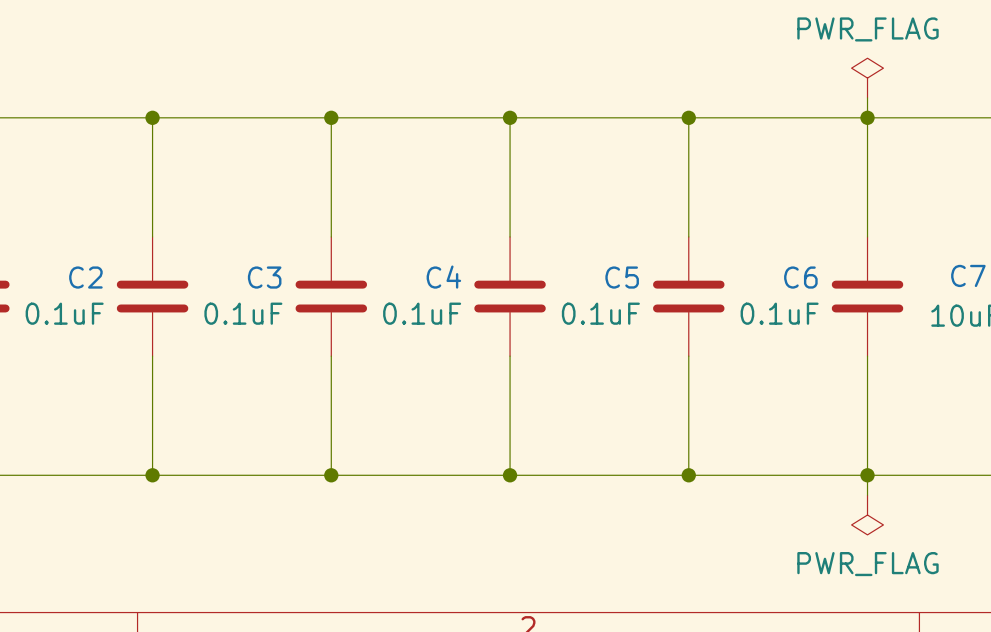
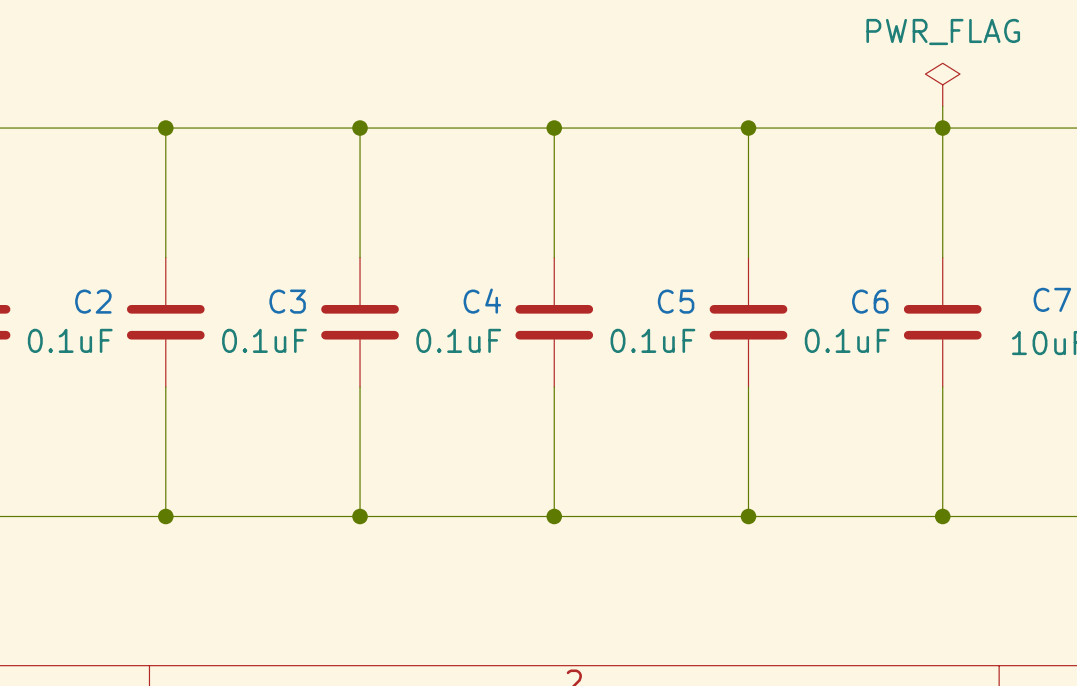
wire: (867, 475) (867, 495) -> none
power symbol: PWR_FLAG (867, 515) -> none

